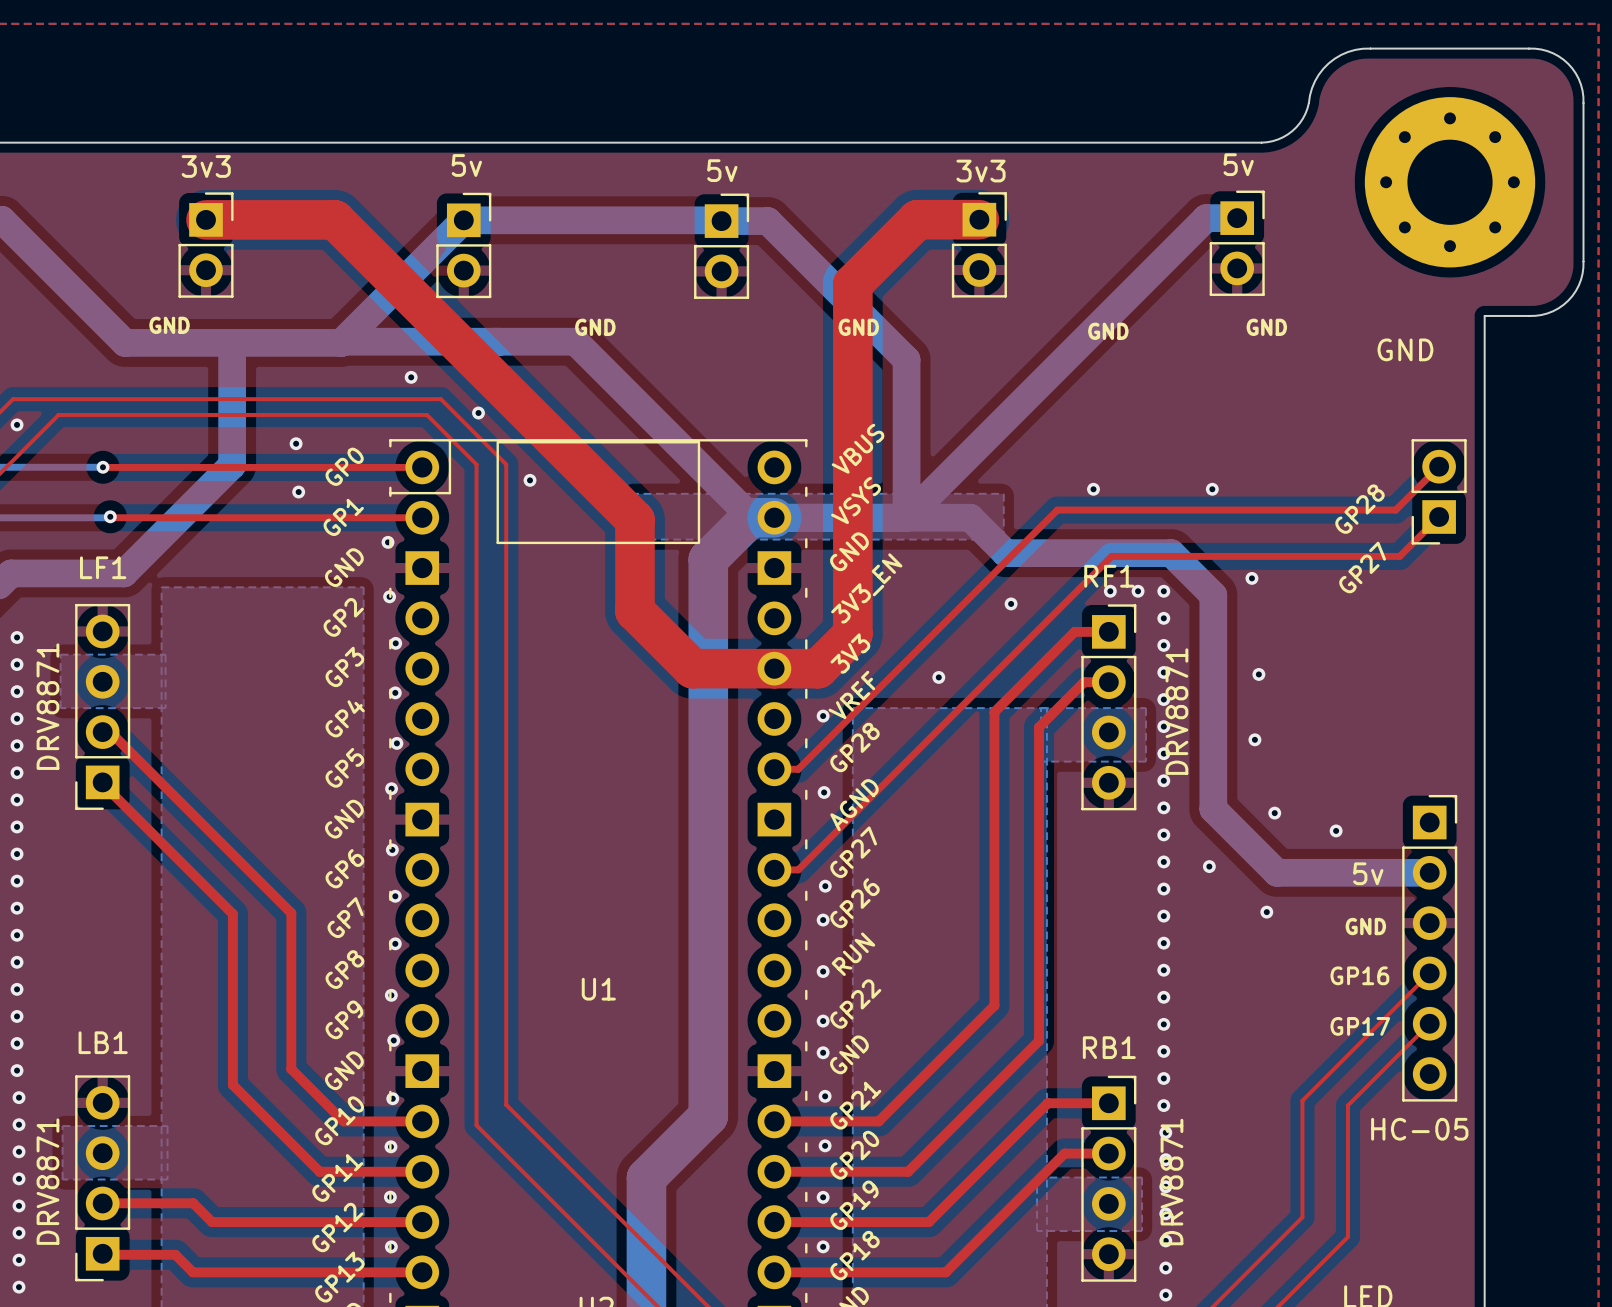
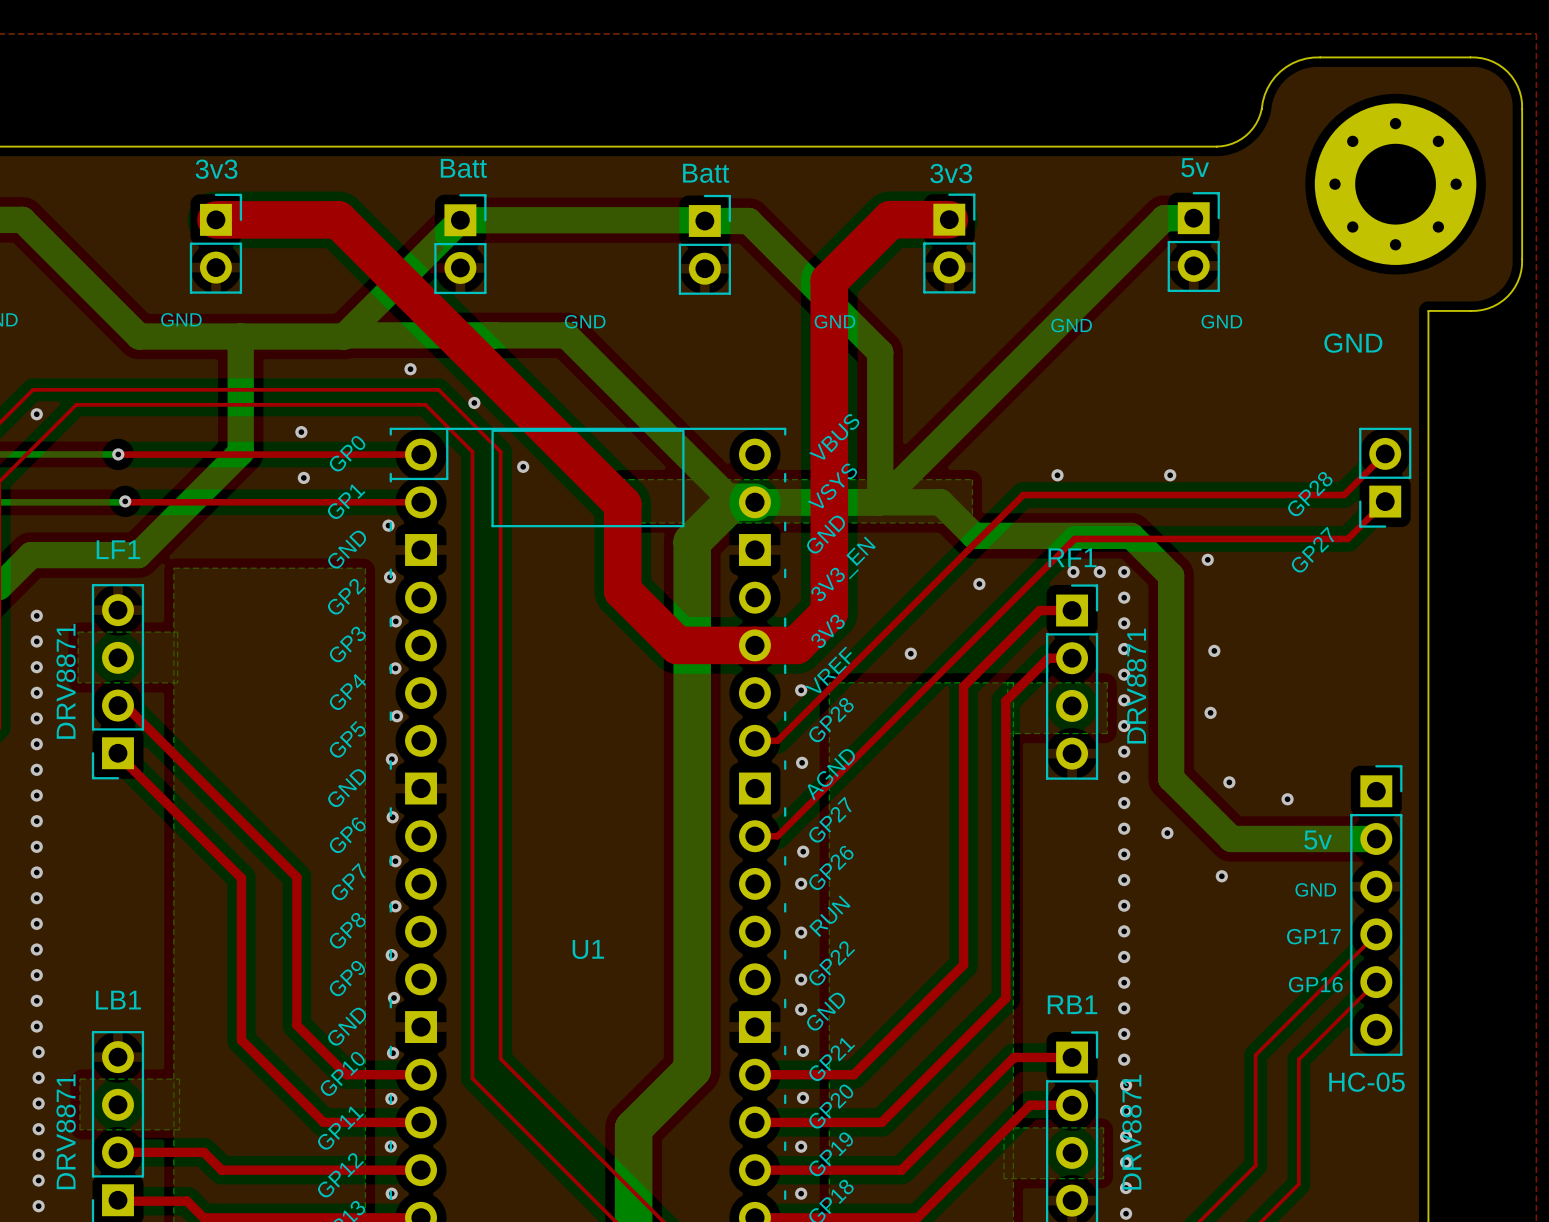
part value: 5v (466, 165) -> Batt (463, 168)
part value: 5v (722, 170) -> Batt (706, 173)
text: GP16 (1359, 975) -> GP17 (1313, 936)
text: GP17 (1360, 1026) -> GP16 (1315, 984)

